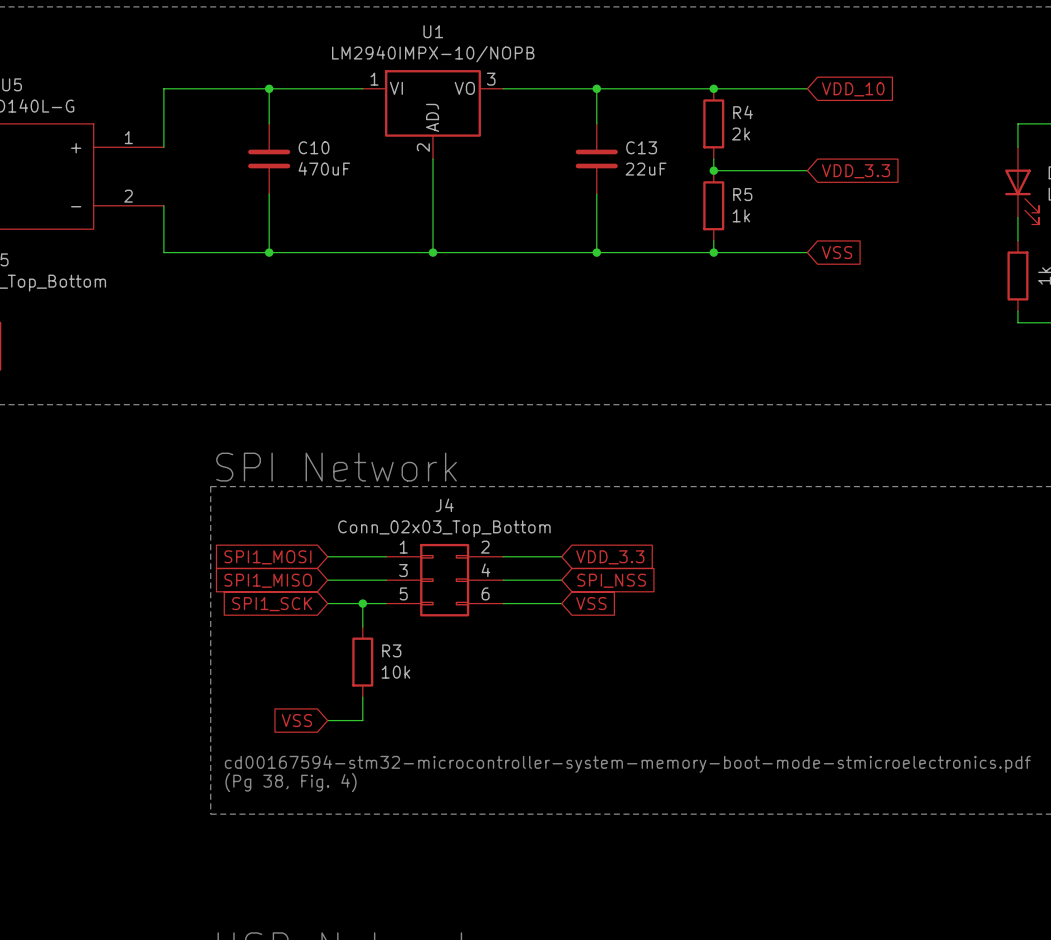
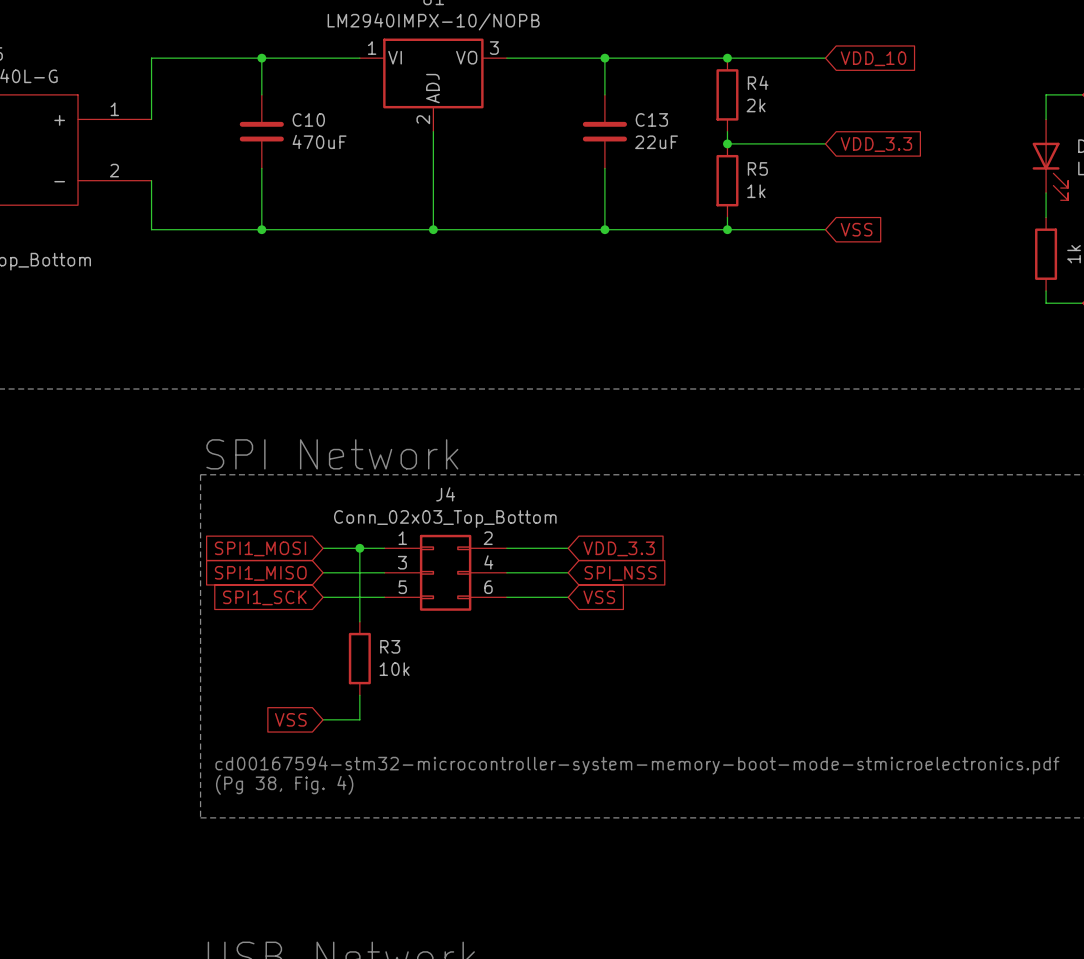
wire: none -> (359, 548) (359, 597)
junction position: (362, 603) -> (359, 548)

